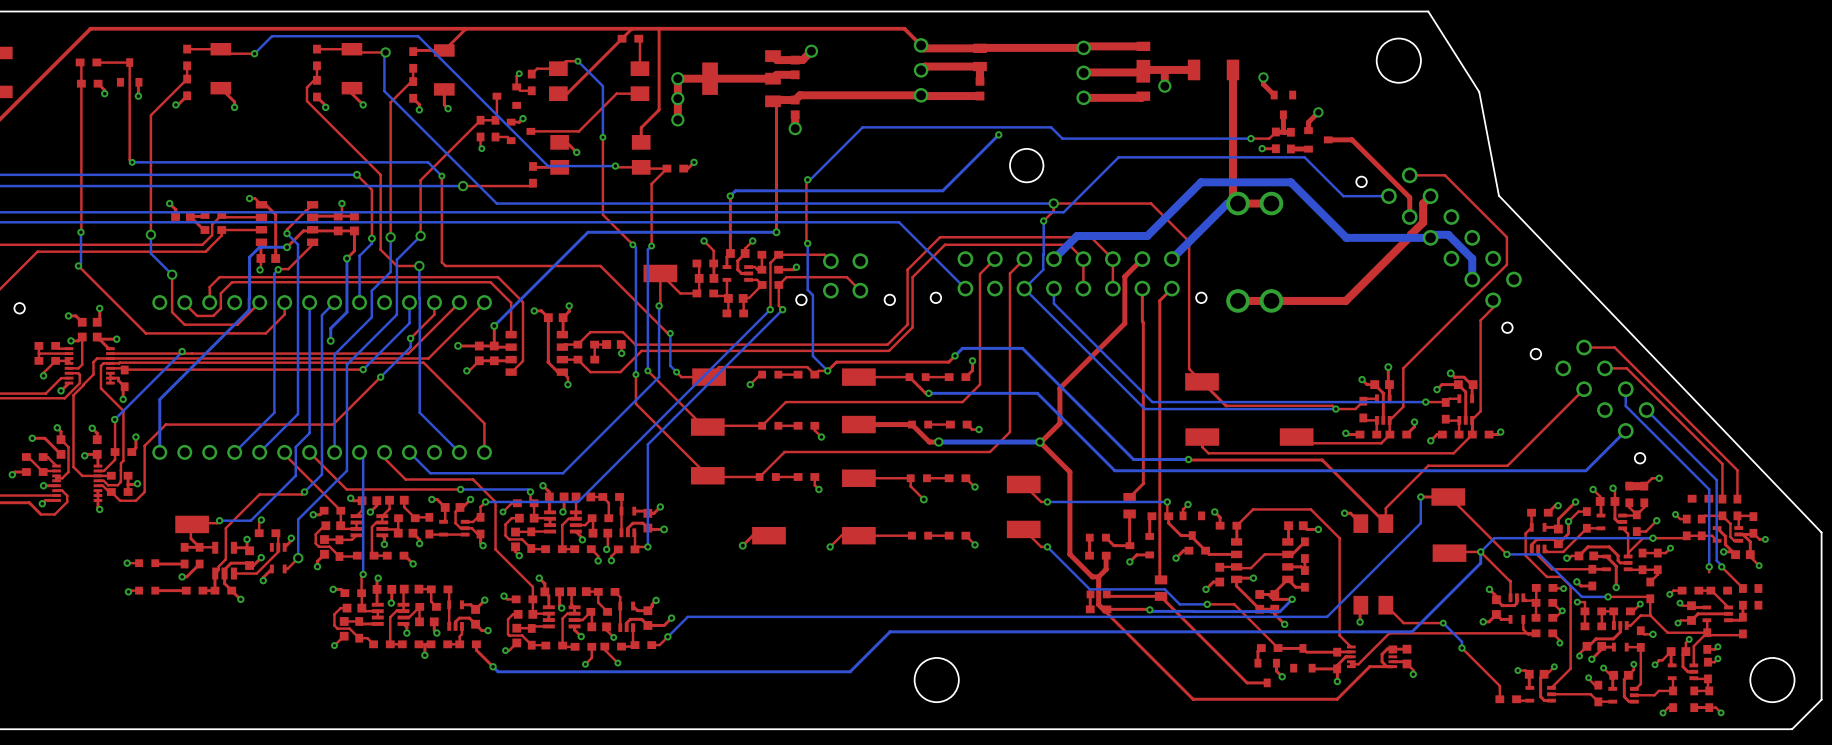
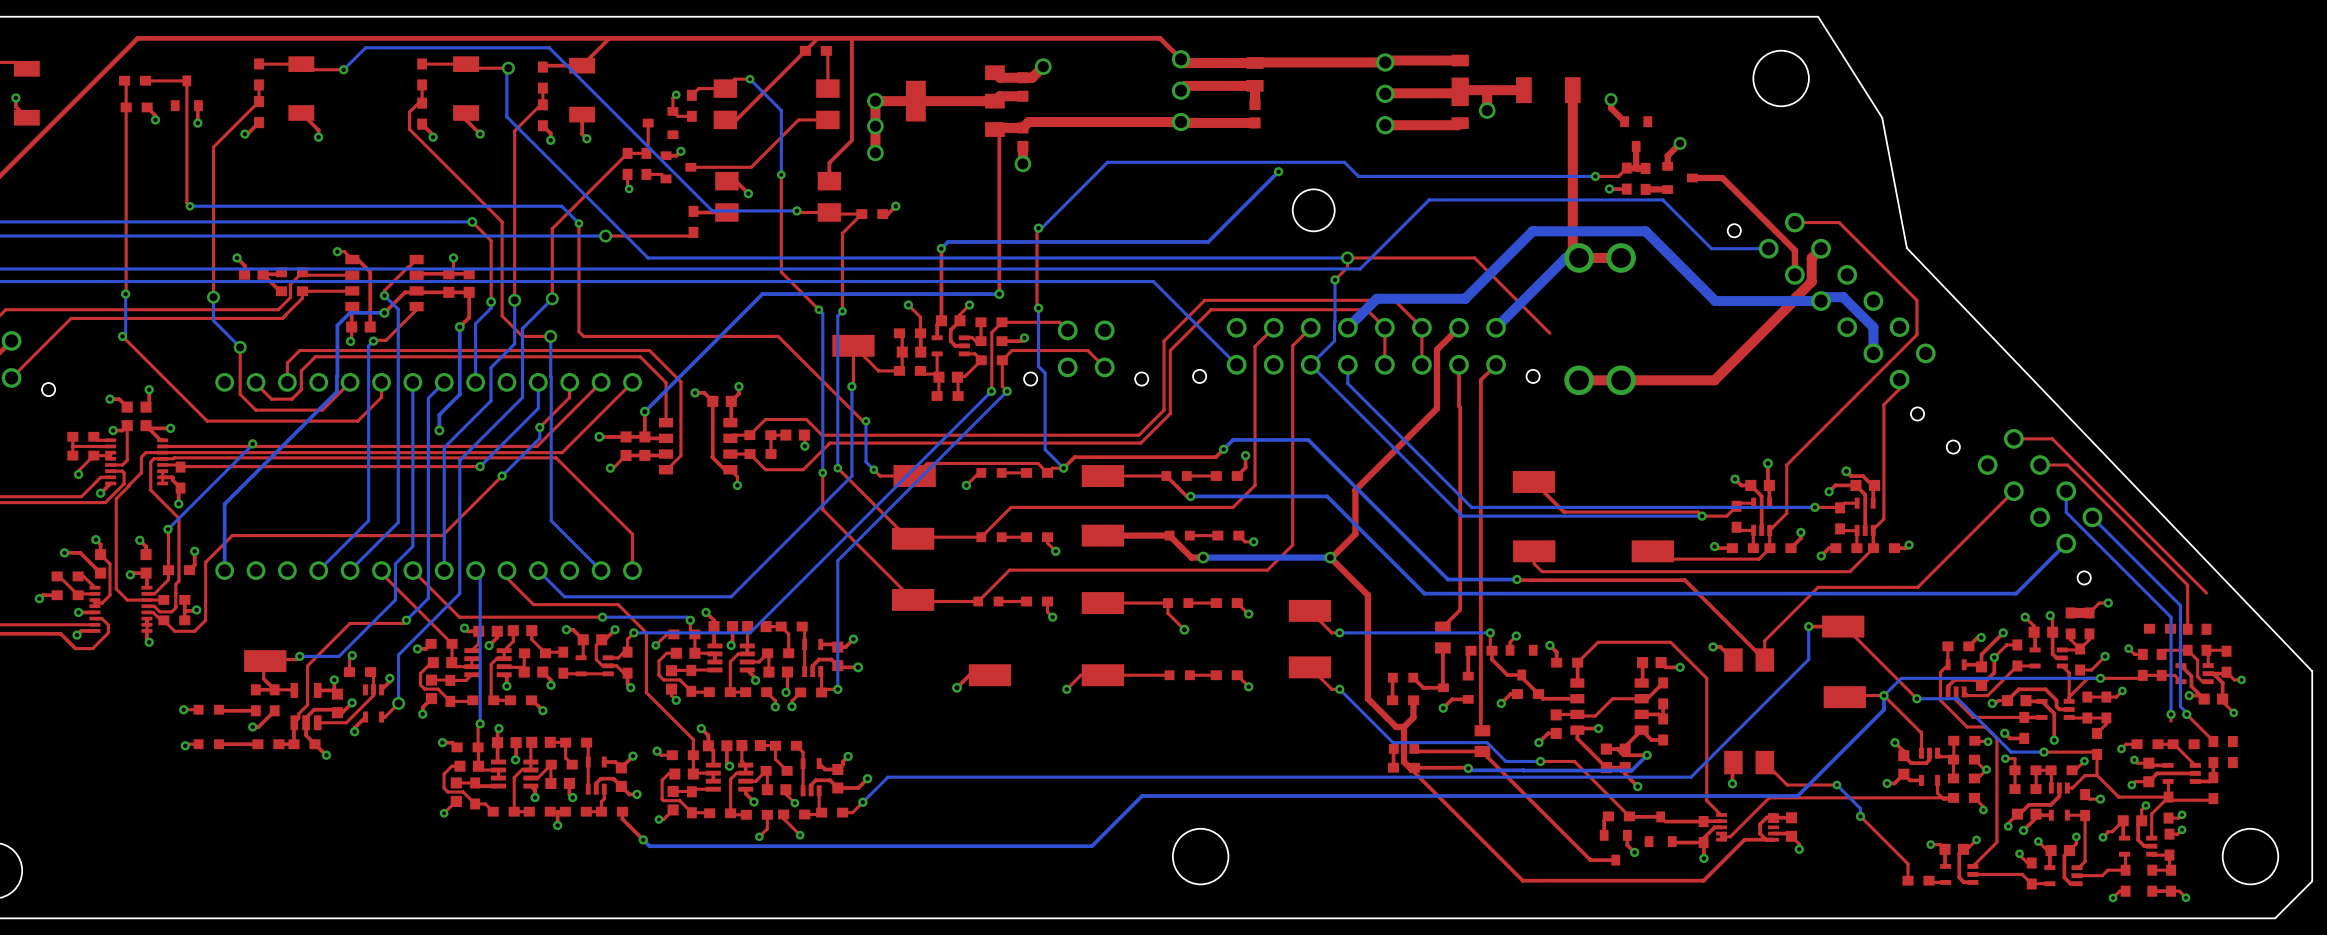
top track: (1151, 203) (1189, 241) (1189, 368) (1202, 381) -> (1469, 257) (1474, 257) (1549, 333)
top track: (1737, 470) (1737, 499) -> none

